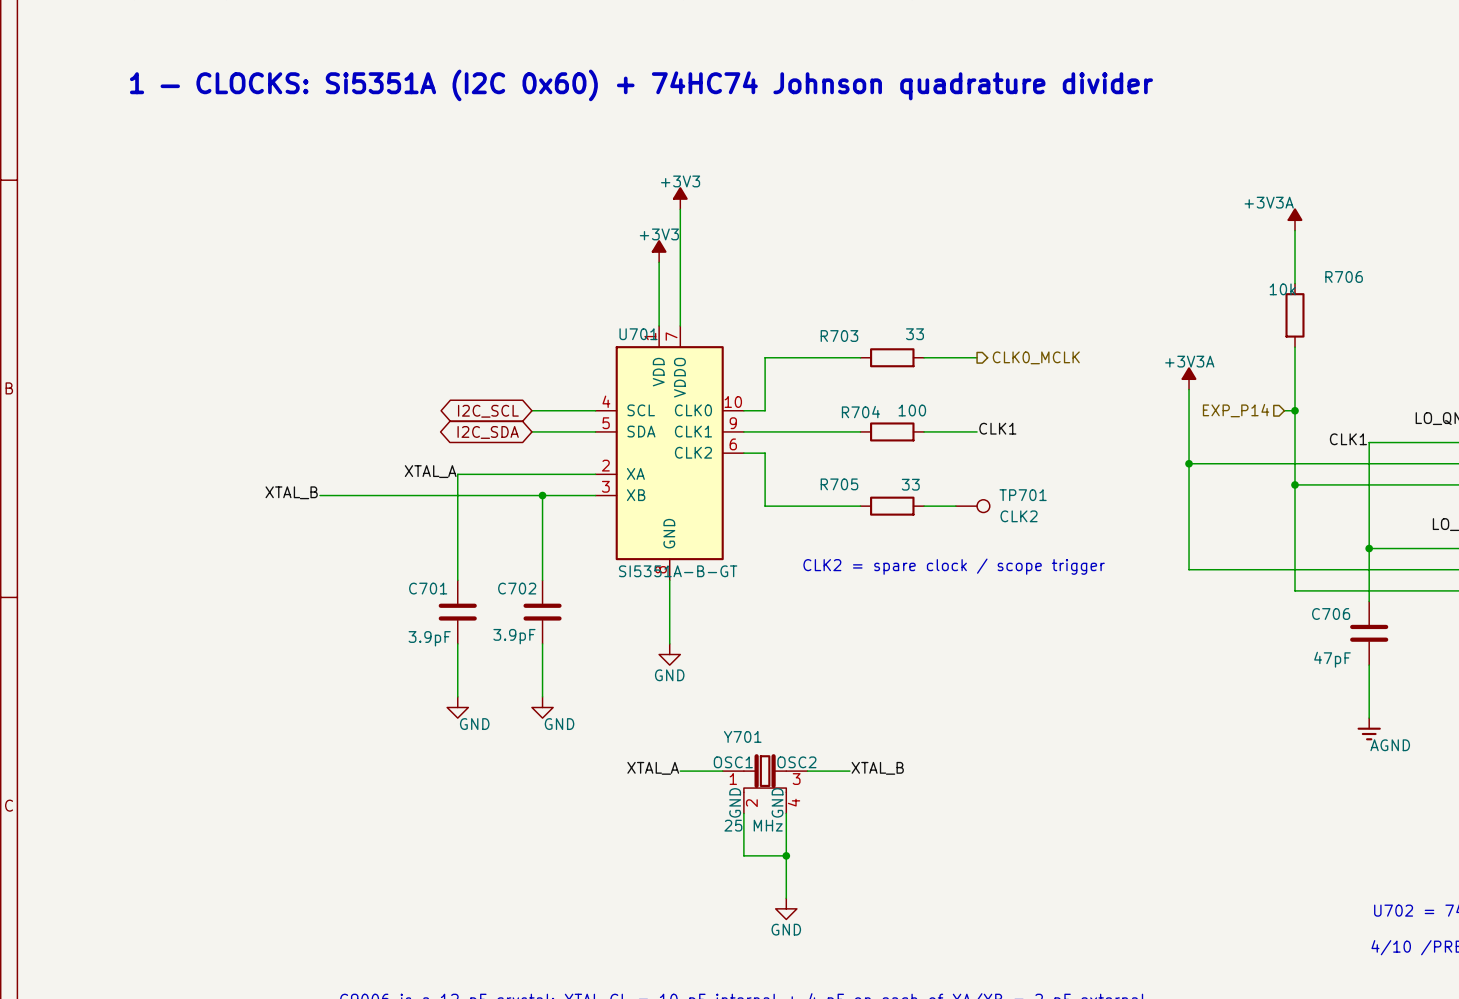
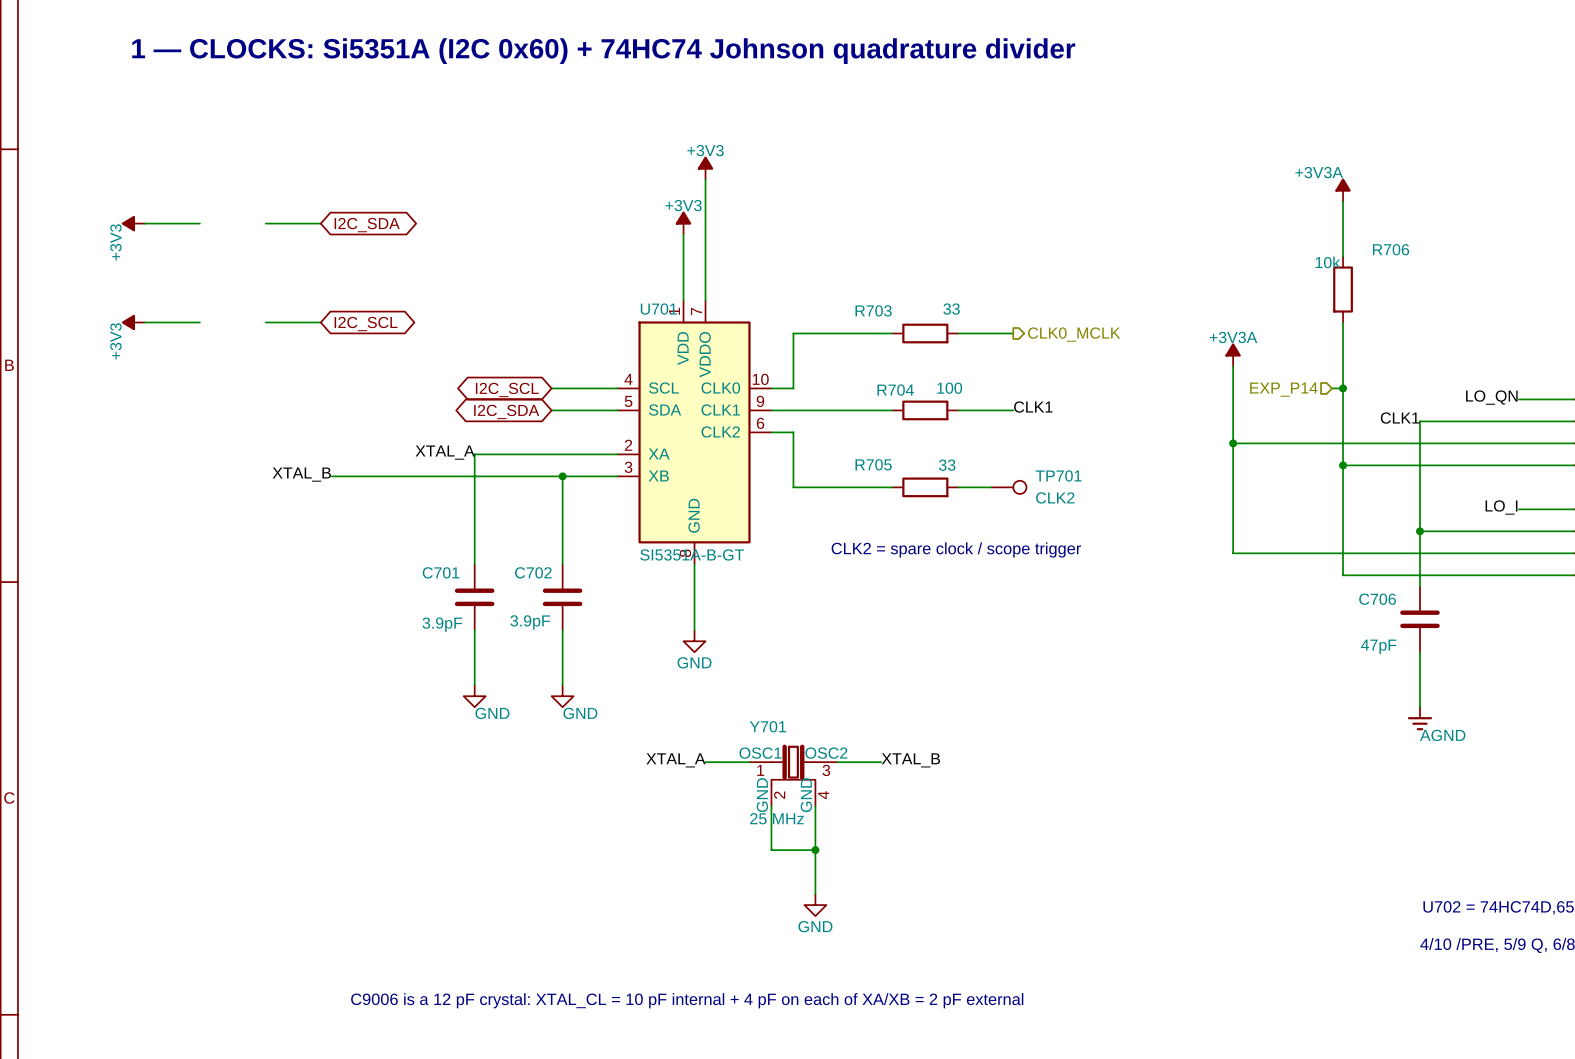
power symbol: none -> +3V3 (133, 223)
wire: none -> (144, 223) (199, 223)
wire: none -> (265, 223) (320, 223)
global label: none -> I2C_SDA (367, 225)
power symbol: none -> +3V3 (133, 322)
wire: none -> (144, 322) (199, 322)
wire: none -> (265, 322) (320, 322)
global label: none -> I2C_SCL (366, 324)

